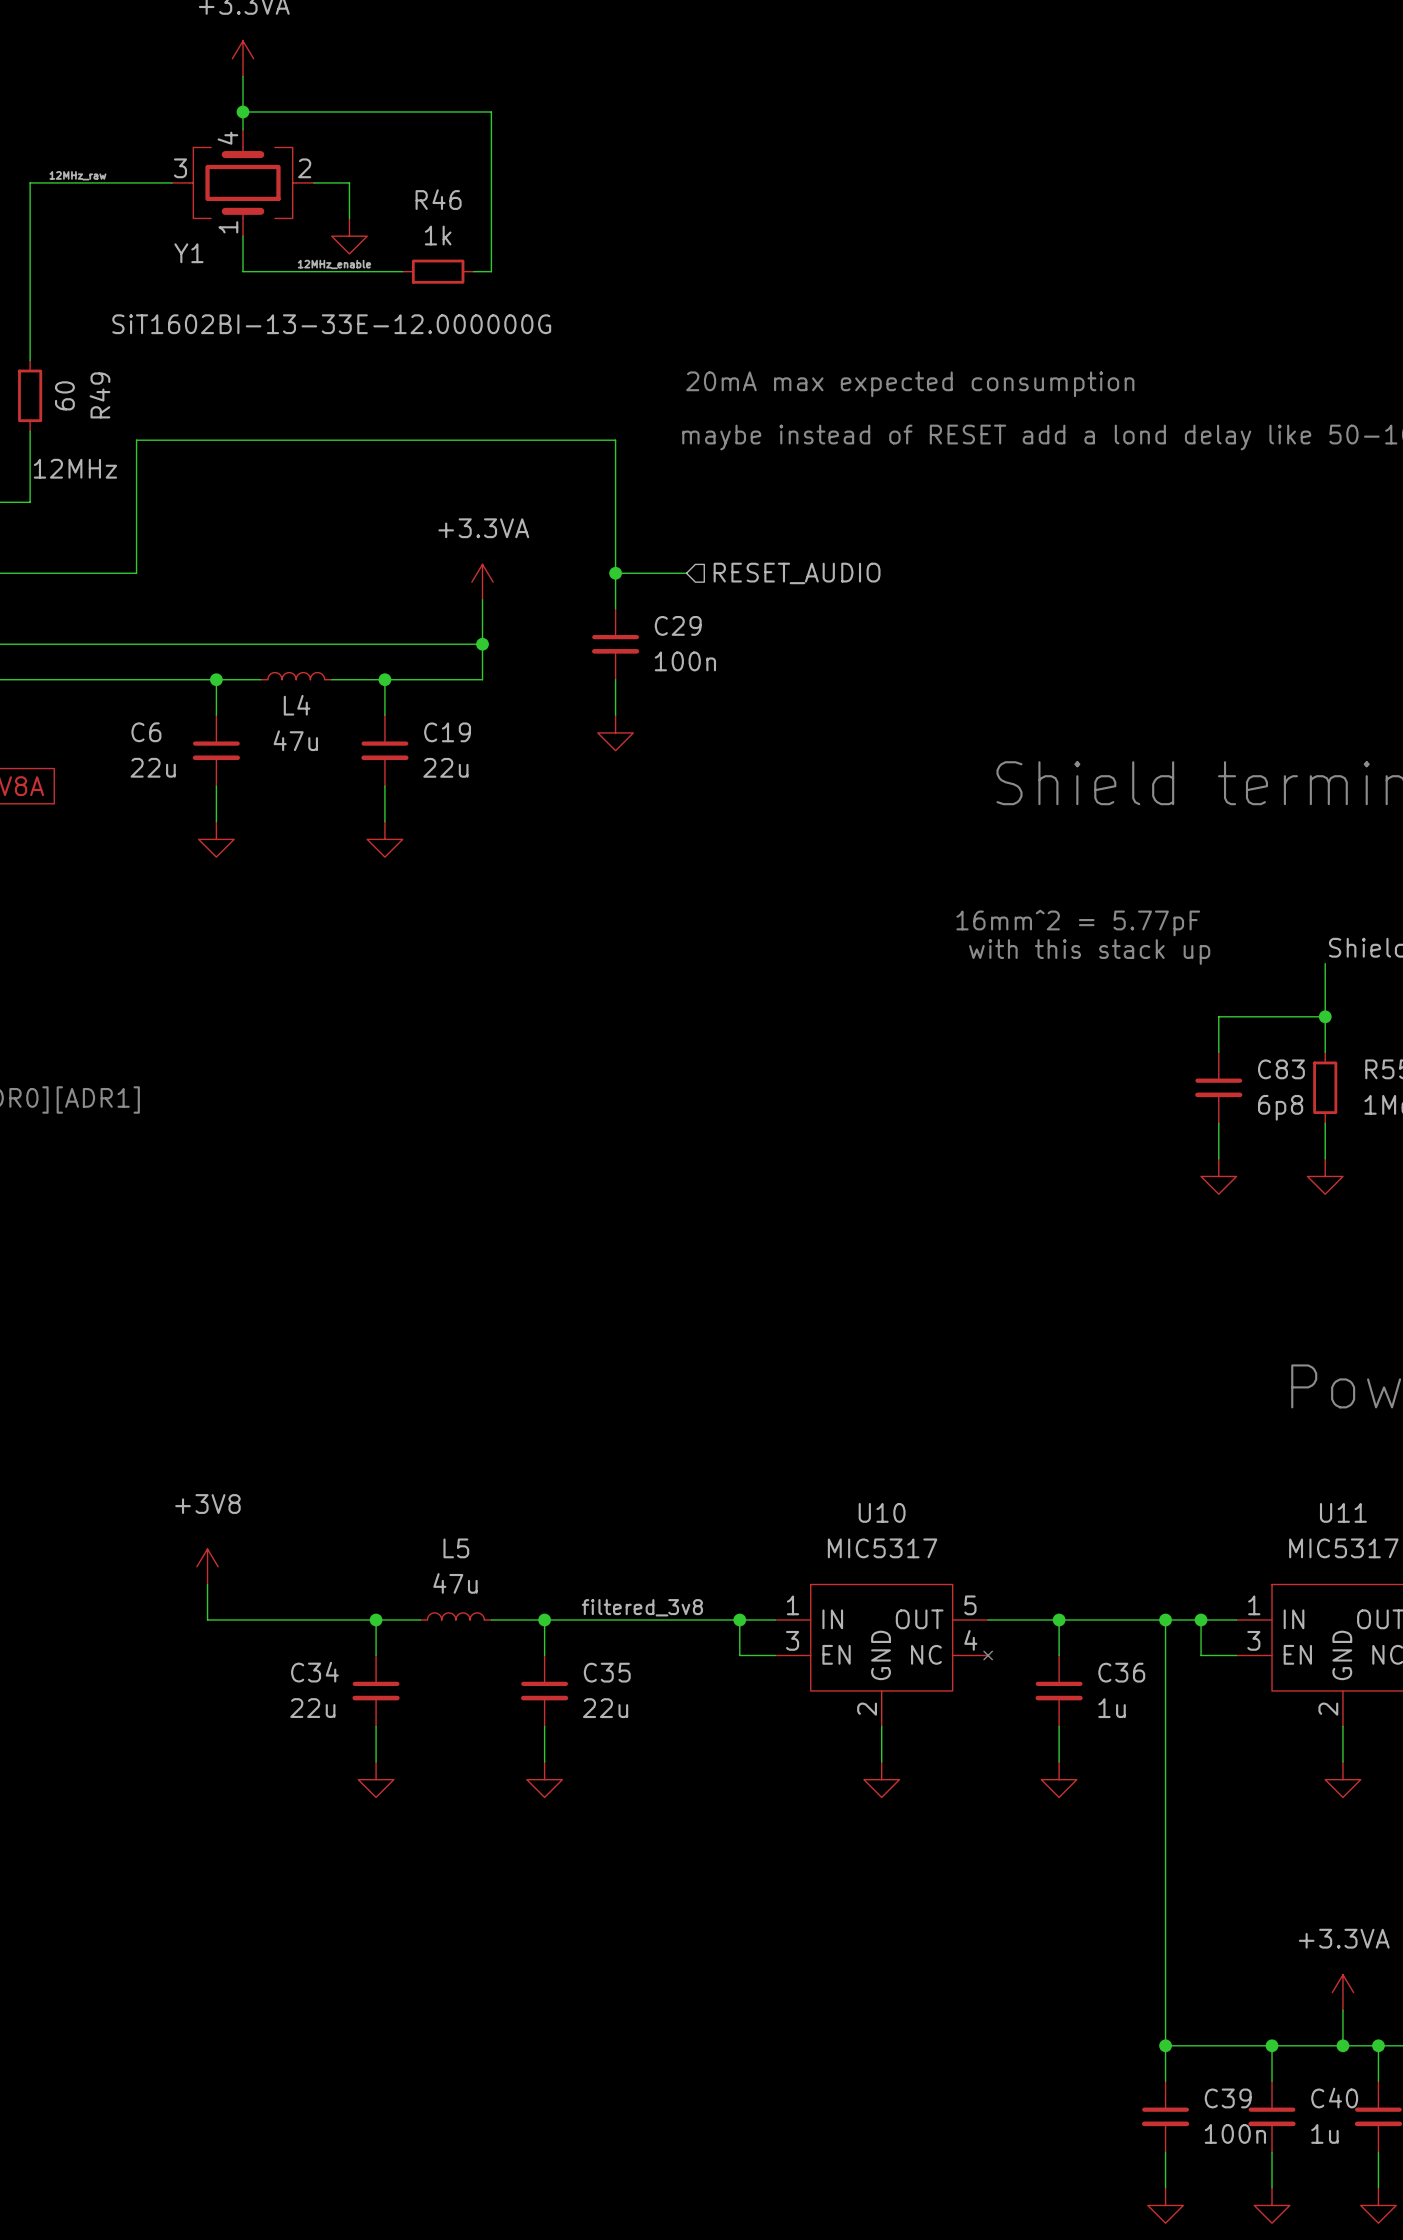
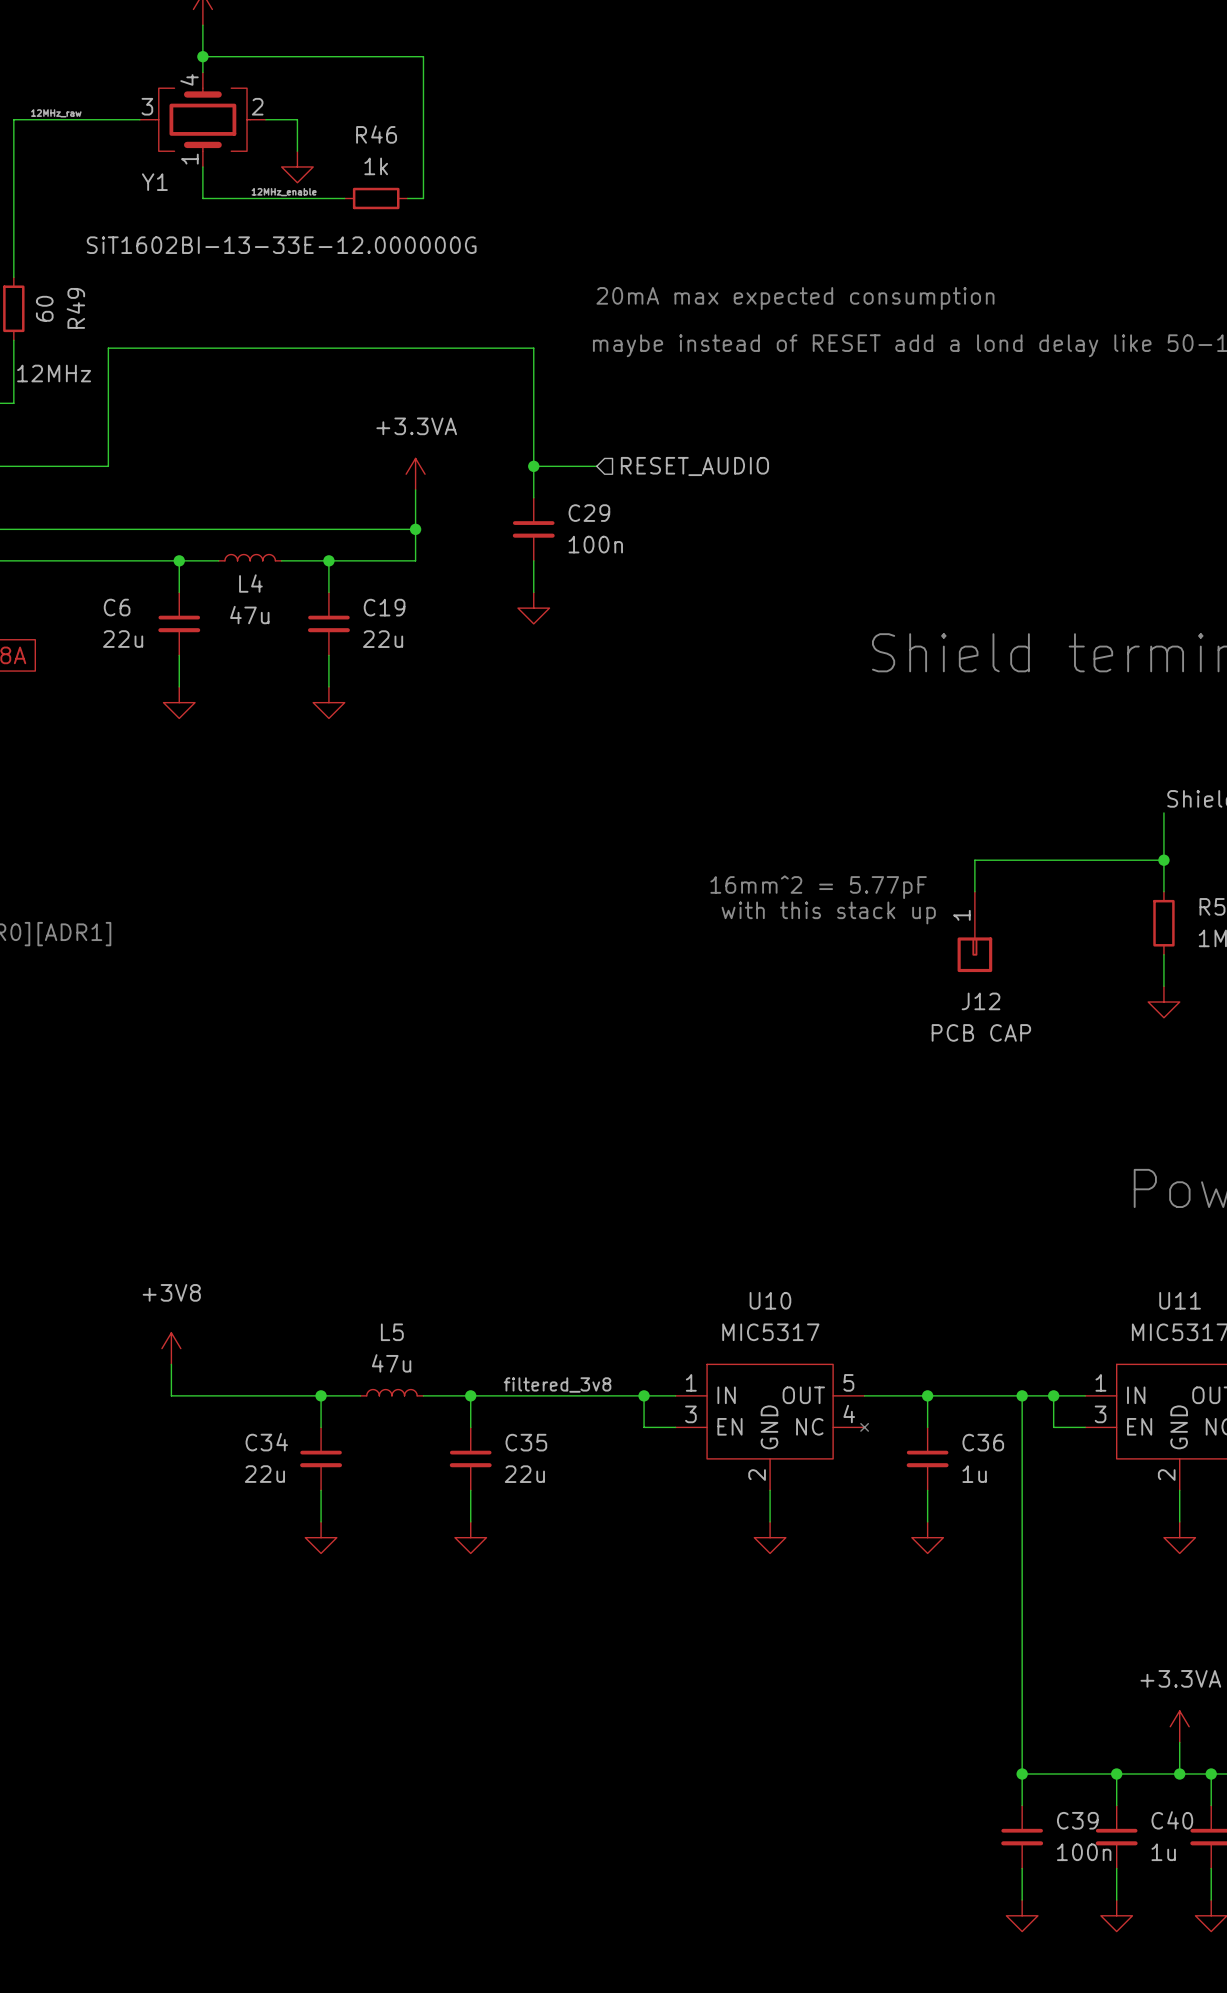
text position: 16mm^2 = 5.77pF (1078, 923) -> 16mm^2 = 5.77pF (818, 887)
text position: with this stack up (1089, 952) -> with this stack up (828, 912)
wire: (1218, 1016) (1218, 1052) -> (1069, 860) (974, 860) (974, 891)
C83: 6p8 (1218, 1087) -> none
J12: none -> PCB CAP (974, 931)
wire: (1218, 1123) (1218, 1158) -> none
power symbol: (1218, 1176) -> none

